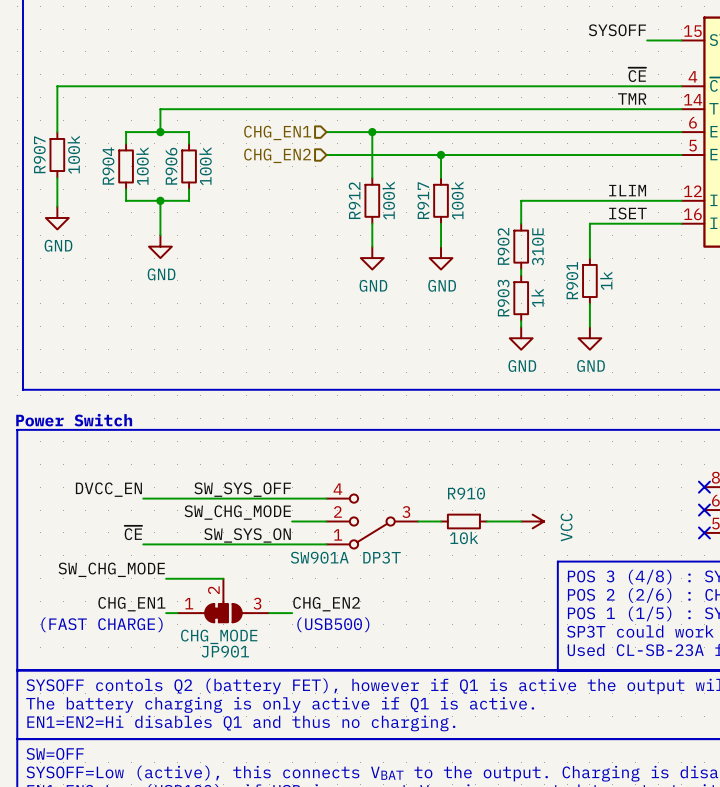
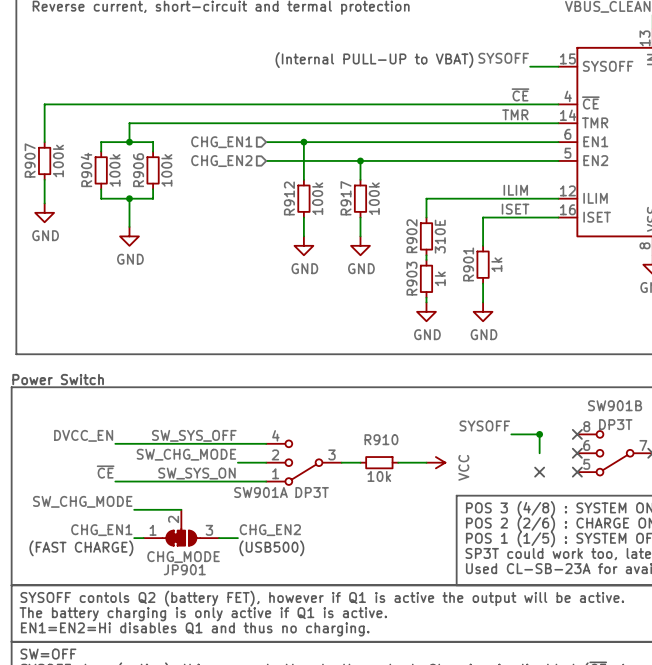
text: none -> (Internal PULL-UP to VBAT) (374, 60)
label: none -> SYSOFF (484, 425)
wire: none -> (511, 434) (539, 434) (539, 453)
junction: none -> (539, 434)
no-connect mark: none -> (539, 472)

